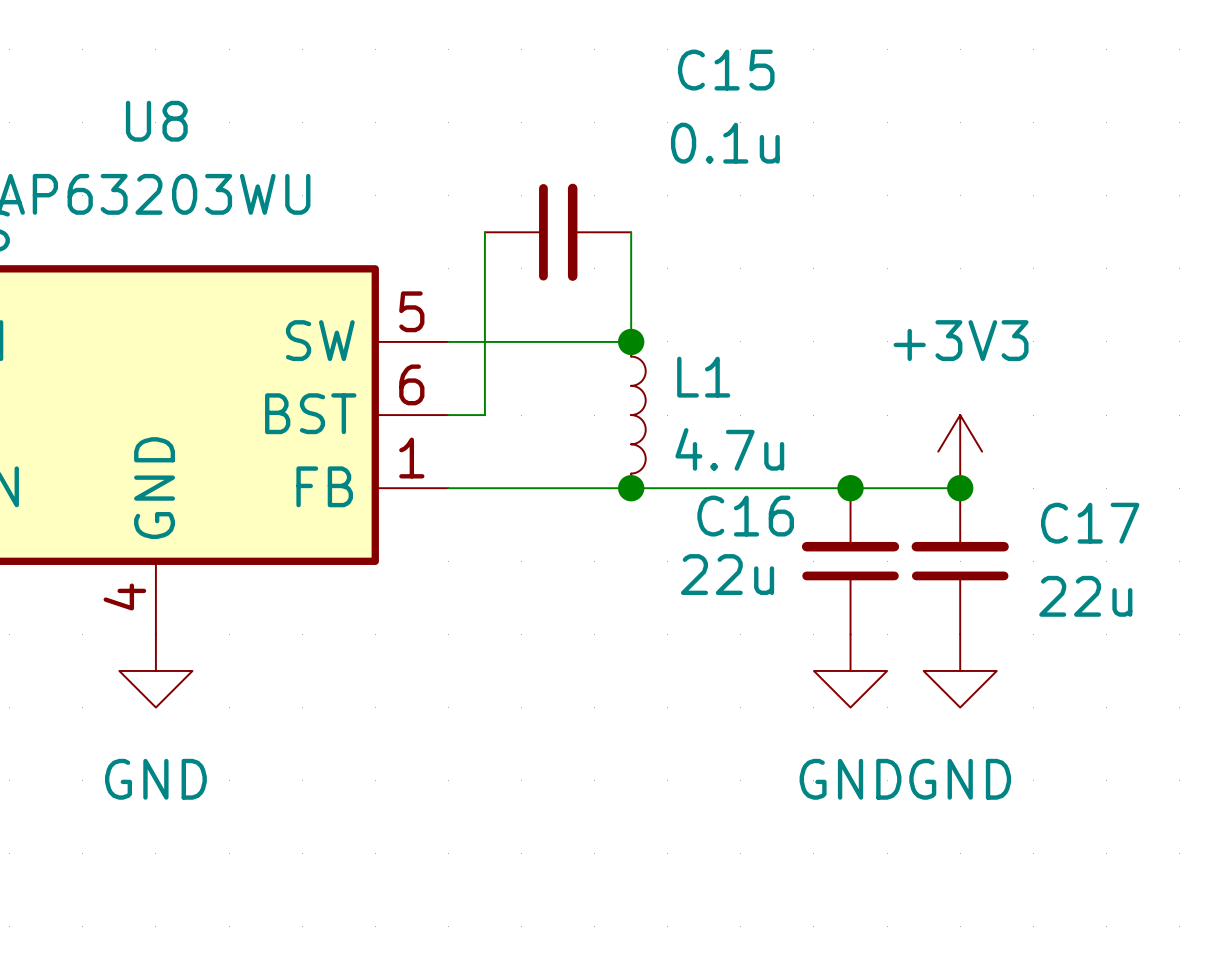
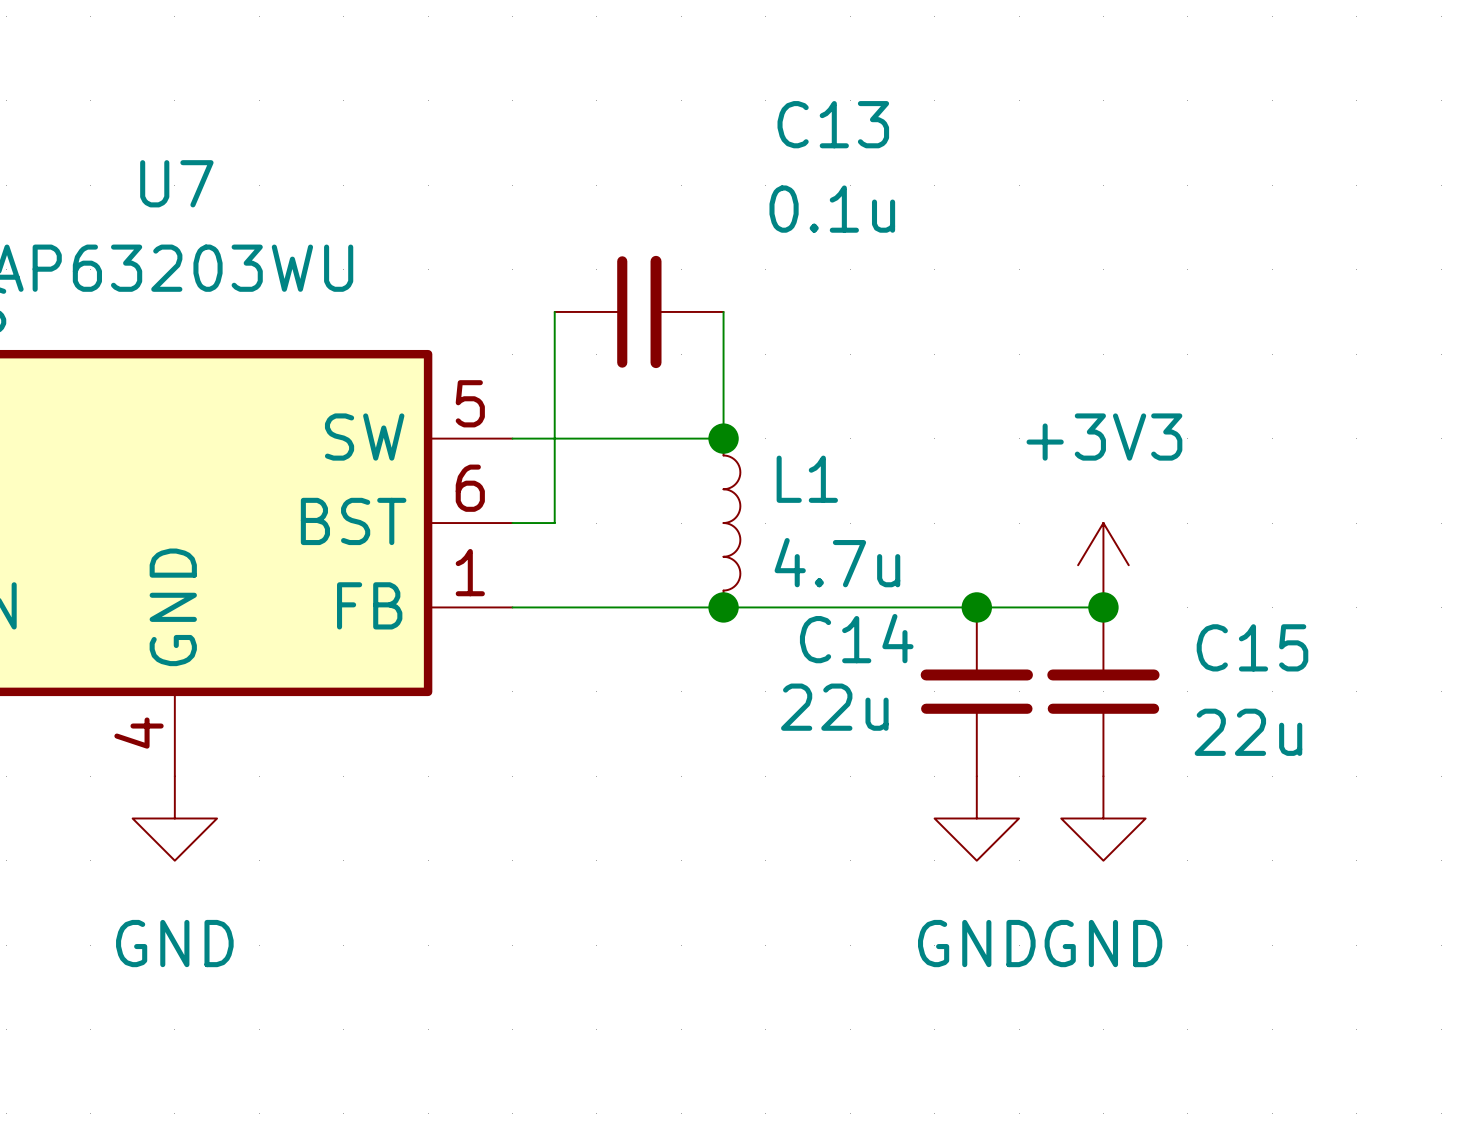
C15 name: C15 (726, 70) -> C13 (833, 124)
U8 name: U8 (156, 121) -> U7 (176, 183)
C16 name: C16 (745, 516) -> C14 (856, 638)
C17 name: C17 (1090, 523) -> C15 (1252, 647)

